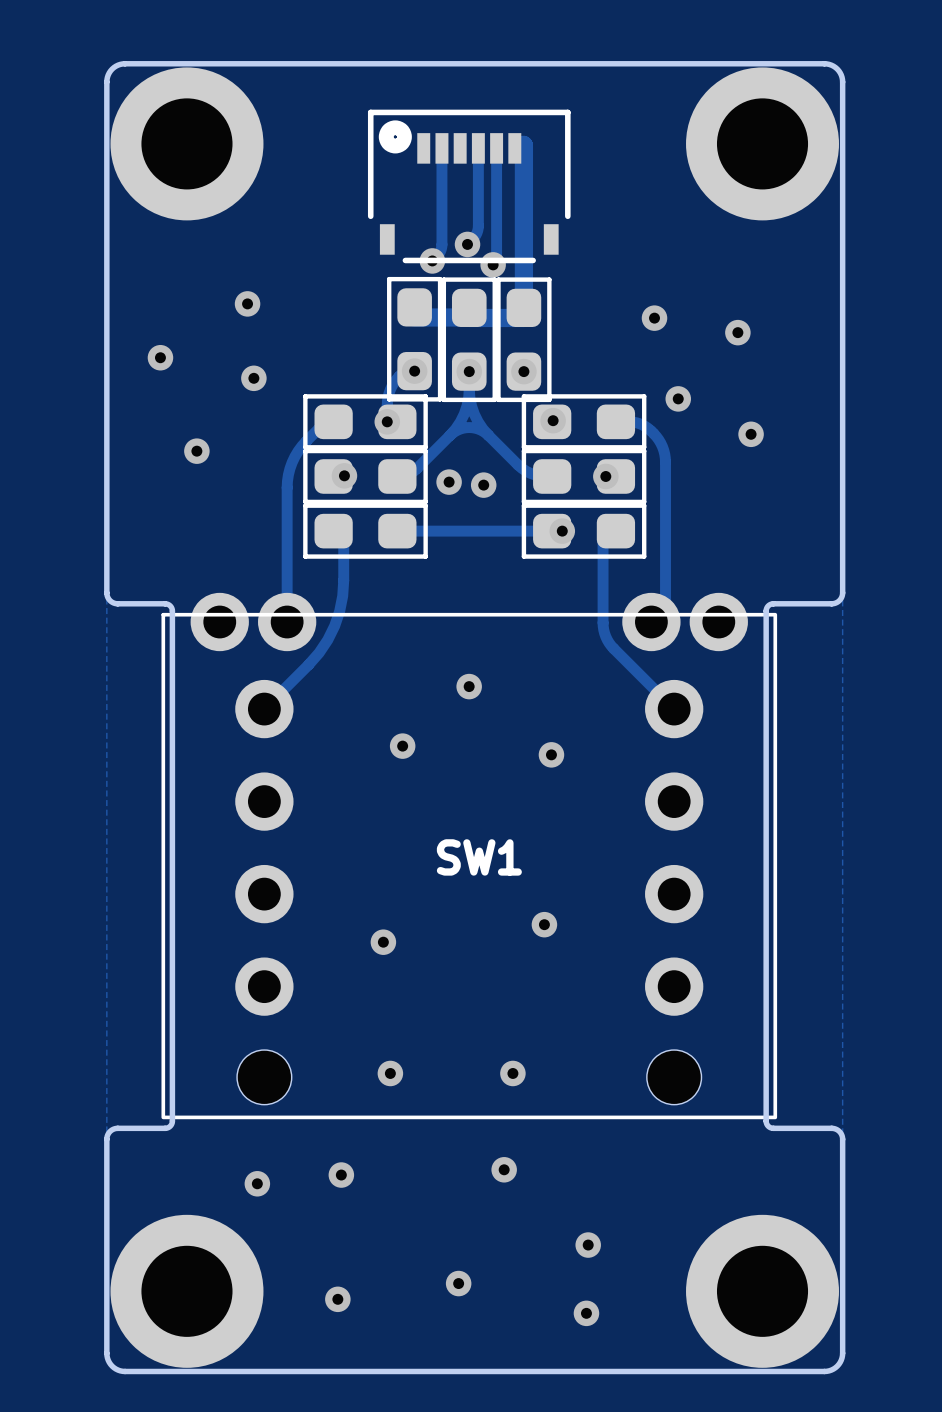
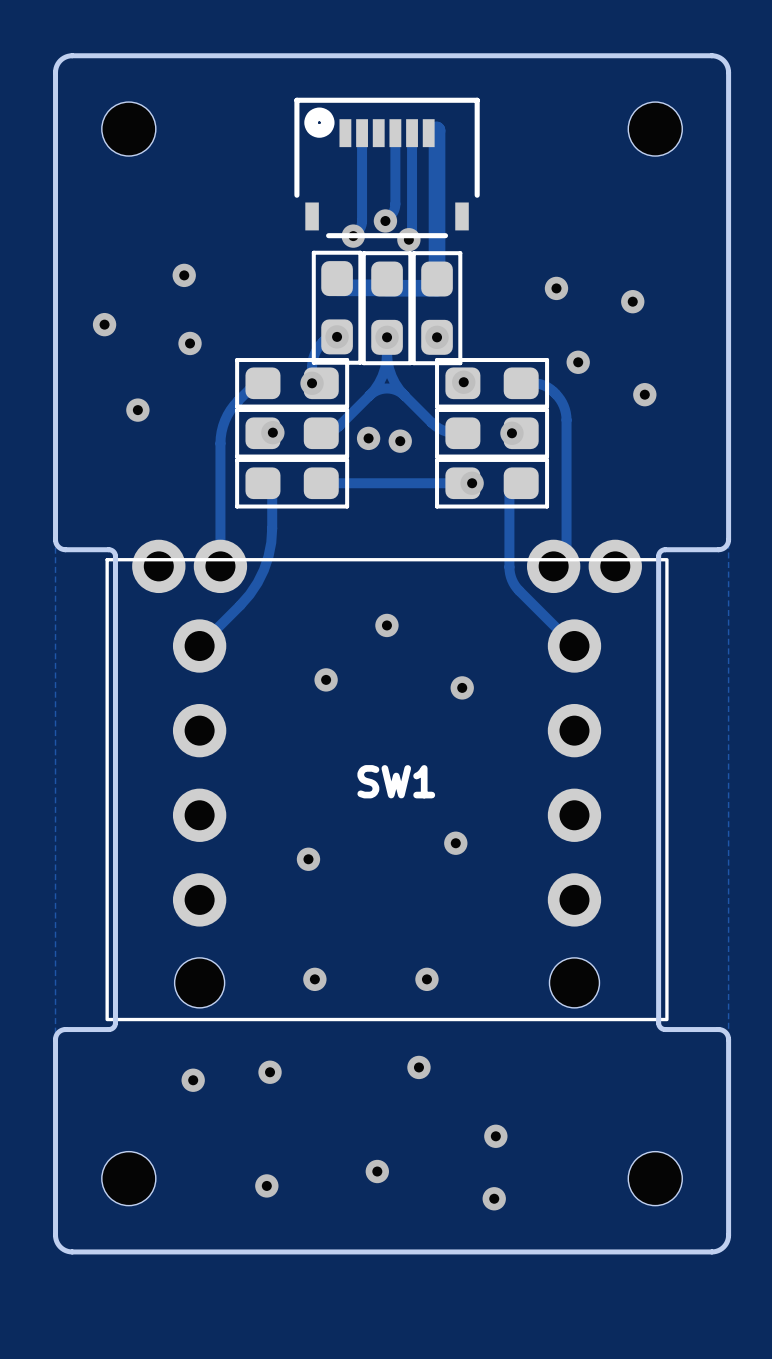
part footprint: [110, 67, 264, 221] -> [101, 102, 156, 157]
part footprint: [686, 67, 840, 221] -> [628, 102, 683, 157]
part footprint: [110, 1214, 264, 1368] -> [101, 1151, 156, 1206]
part footprint: [686, 1214, 840, 1368] -> [628, 1151, 683, 1206]

